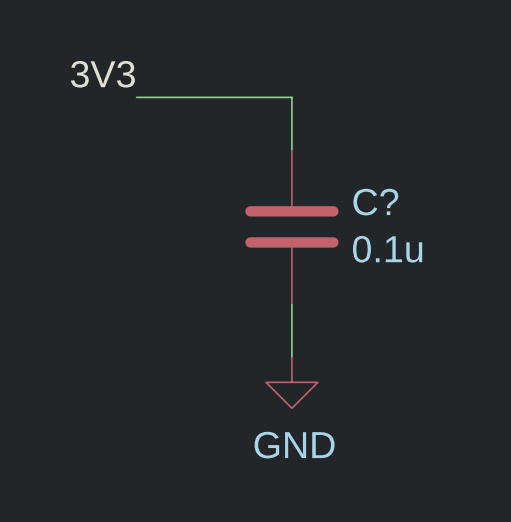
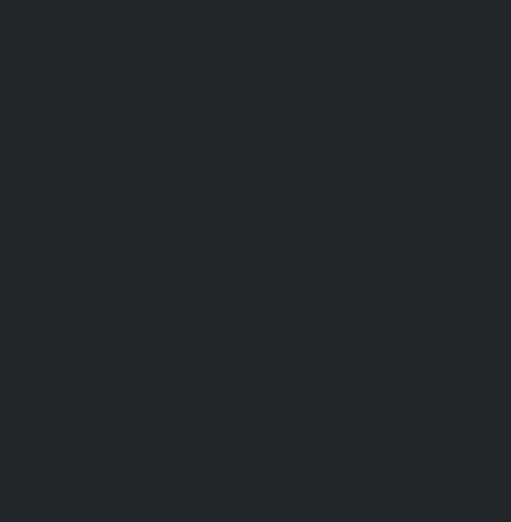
label: 3V3 (102, 74) -> none
wire: (136, 97) (291, 97) (291, 149) -> none
C?: 0.1u (291, 226) -> none
wire: (291, 304) (291, 356) -> none
power symbol: GND (291, 382) -> none

